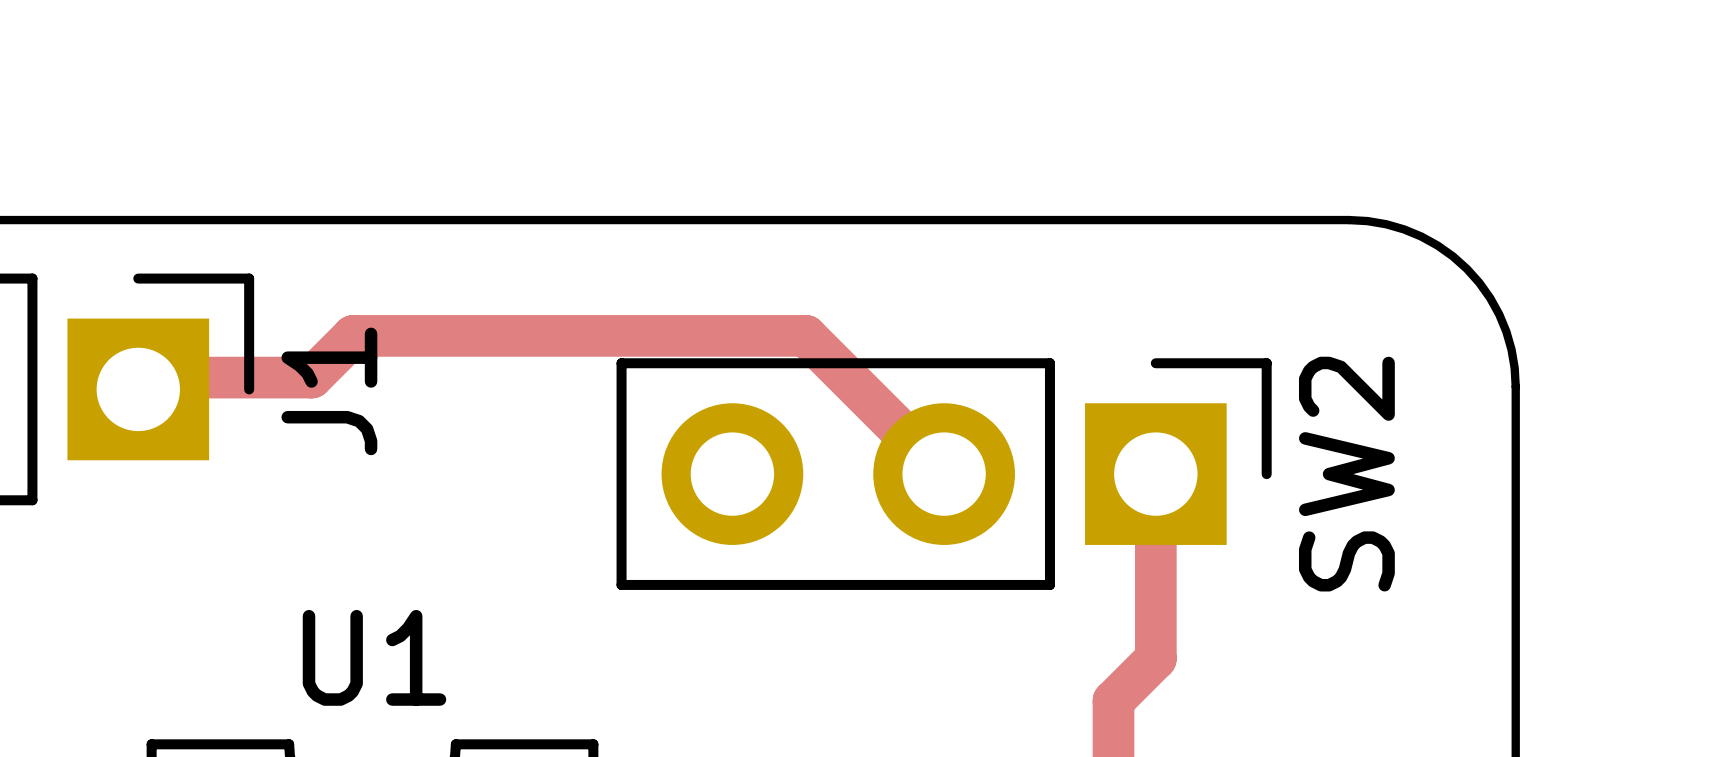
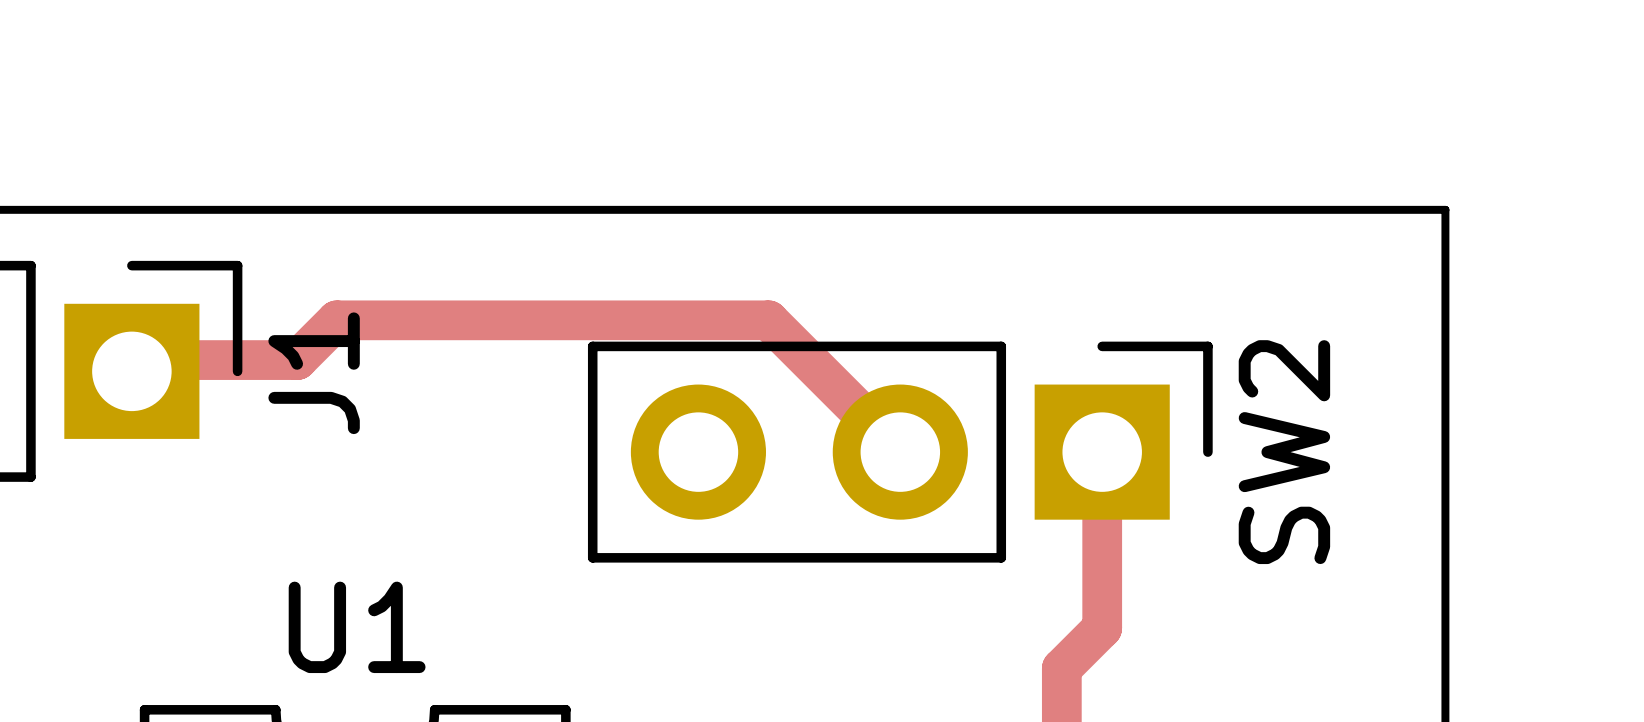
board edge: (1349, 220) (1386, 224) (1421, 236) (1452, 256) (1466, 268) (1490, 298) (1499, 314) (1511, 349) (1515, 386) -> (1286, 209) (1445, 209) (1445, 368)

